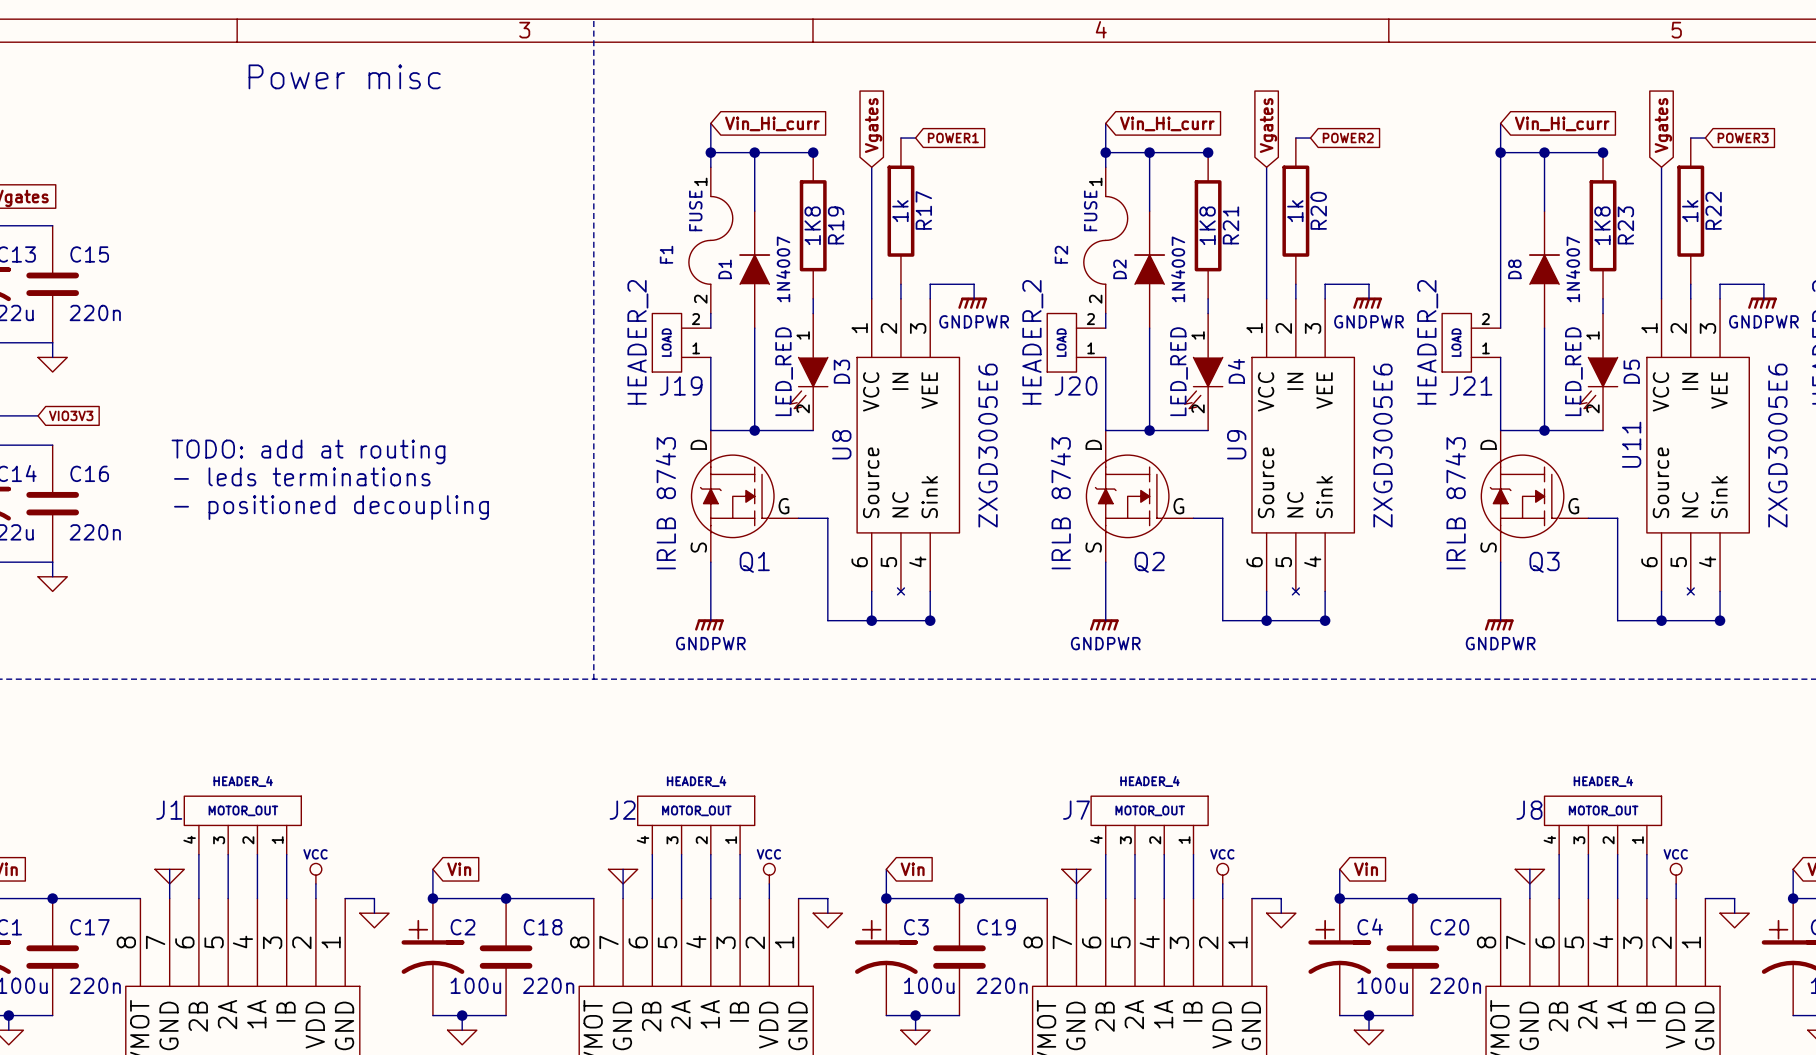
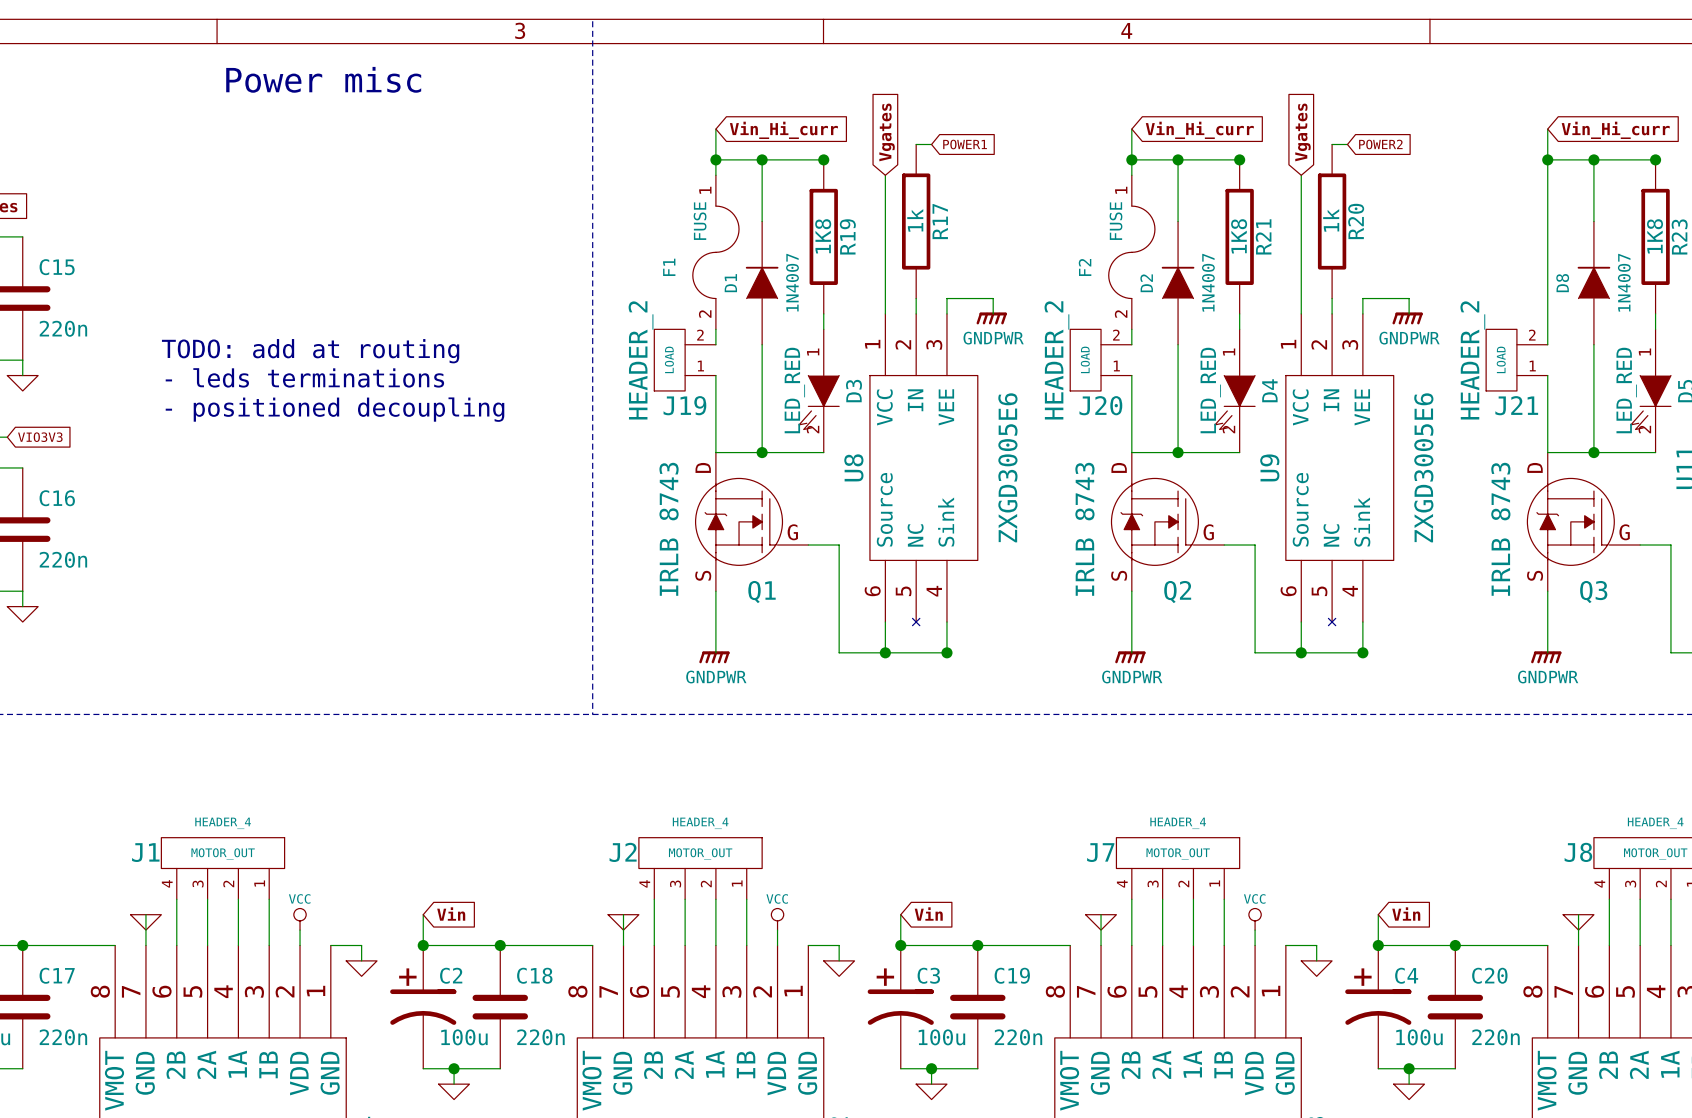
text position: TODO: add at routing (308, 451) -> TODO: add at routing (310, 351)
text position: - leds terminations (302, 476) -> - leds terminations (304, 377)
text position: - positioned decoupling (331, 507) -> - positioned decoupling (335, 409)

